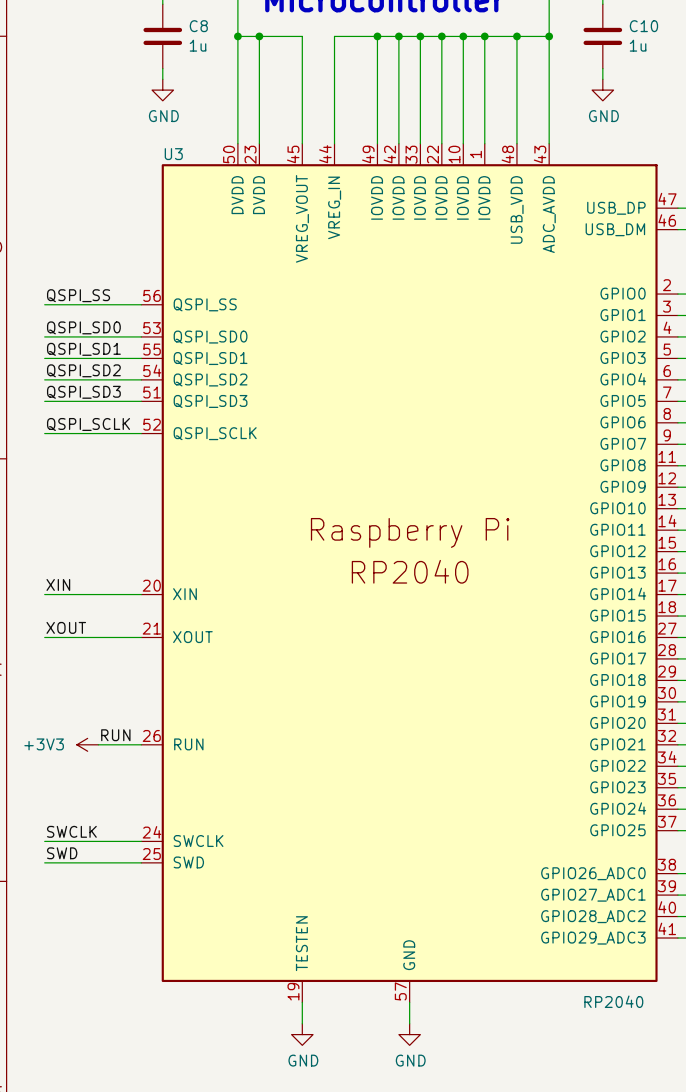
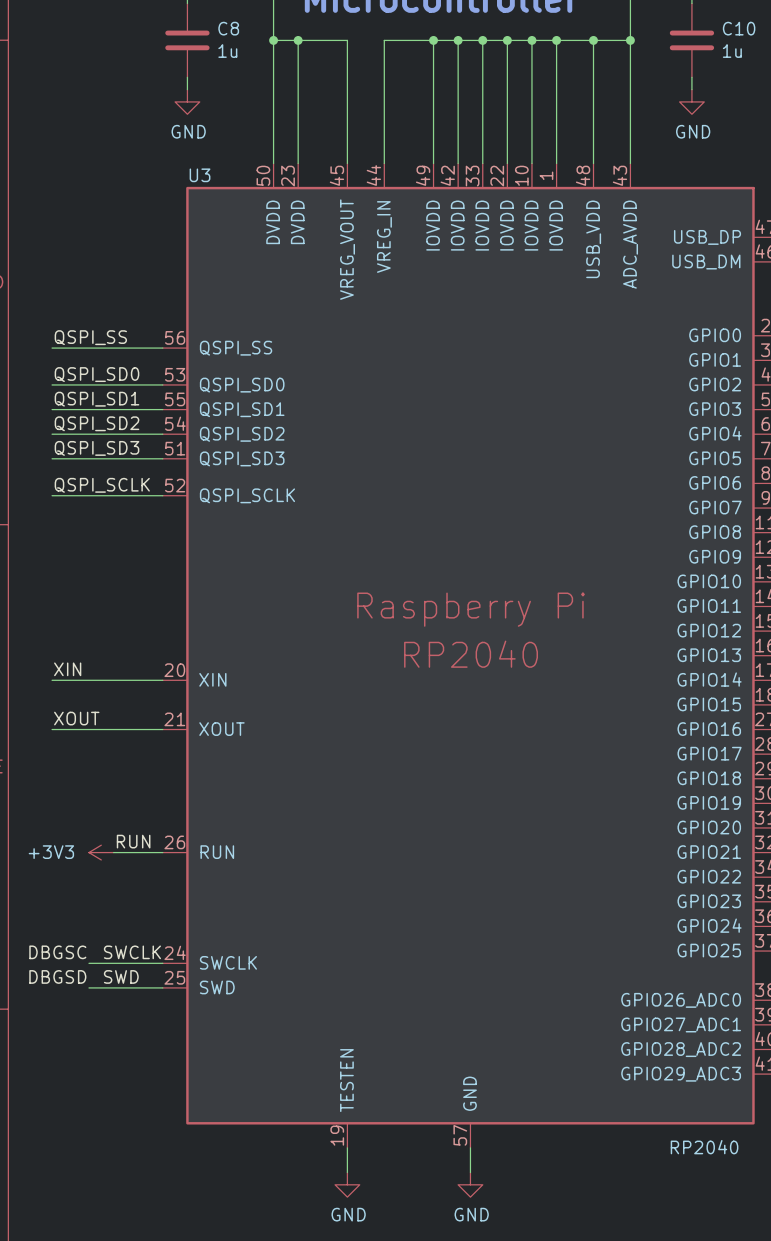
label: none -> DBGSC (57, 952)
label position: SWCLK (71, 831) -> SWCLK (132, 952)
wire: (44, 841) (76, 841) -> none
label: none -> DBGSD (57, 976)
label position: SWD (62, 853) -> SWD (121, 976)
wire: (44, 862) (76, 862) -> none

